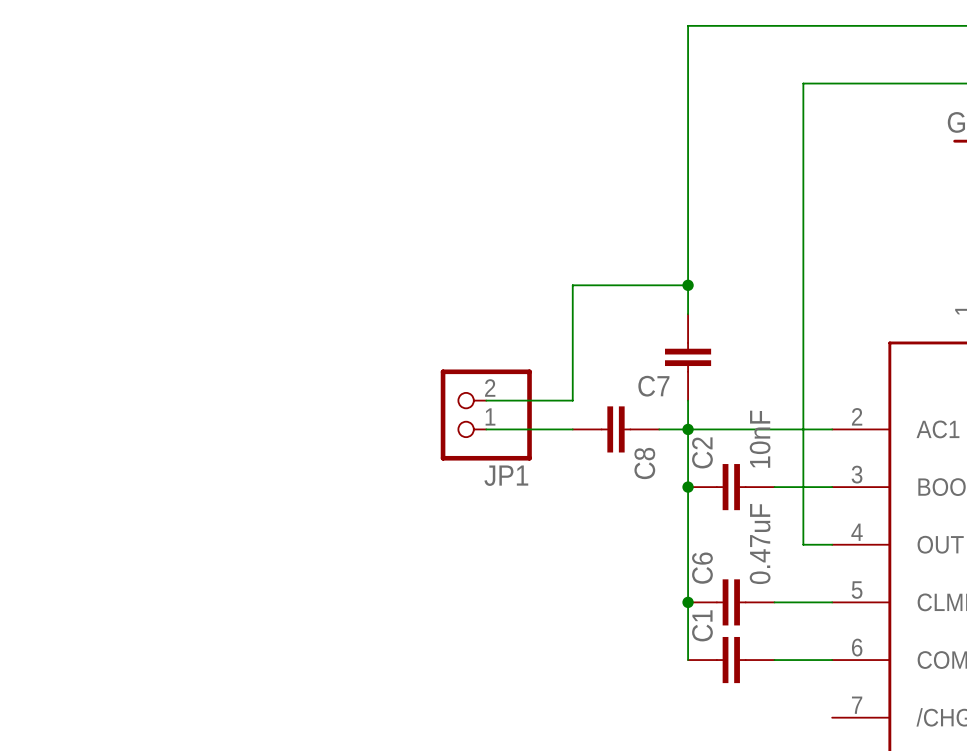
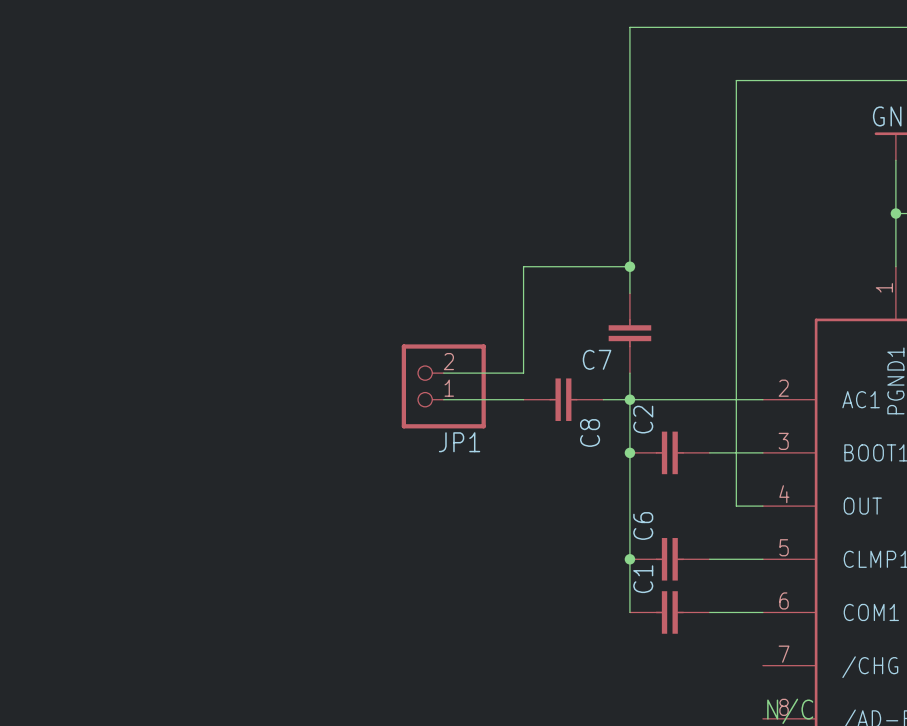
C2 value: 10nF (760, 439) -> none
C6 value: 0.47uF (760, 544) -> none

